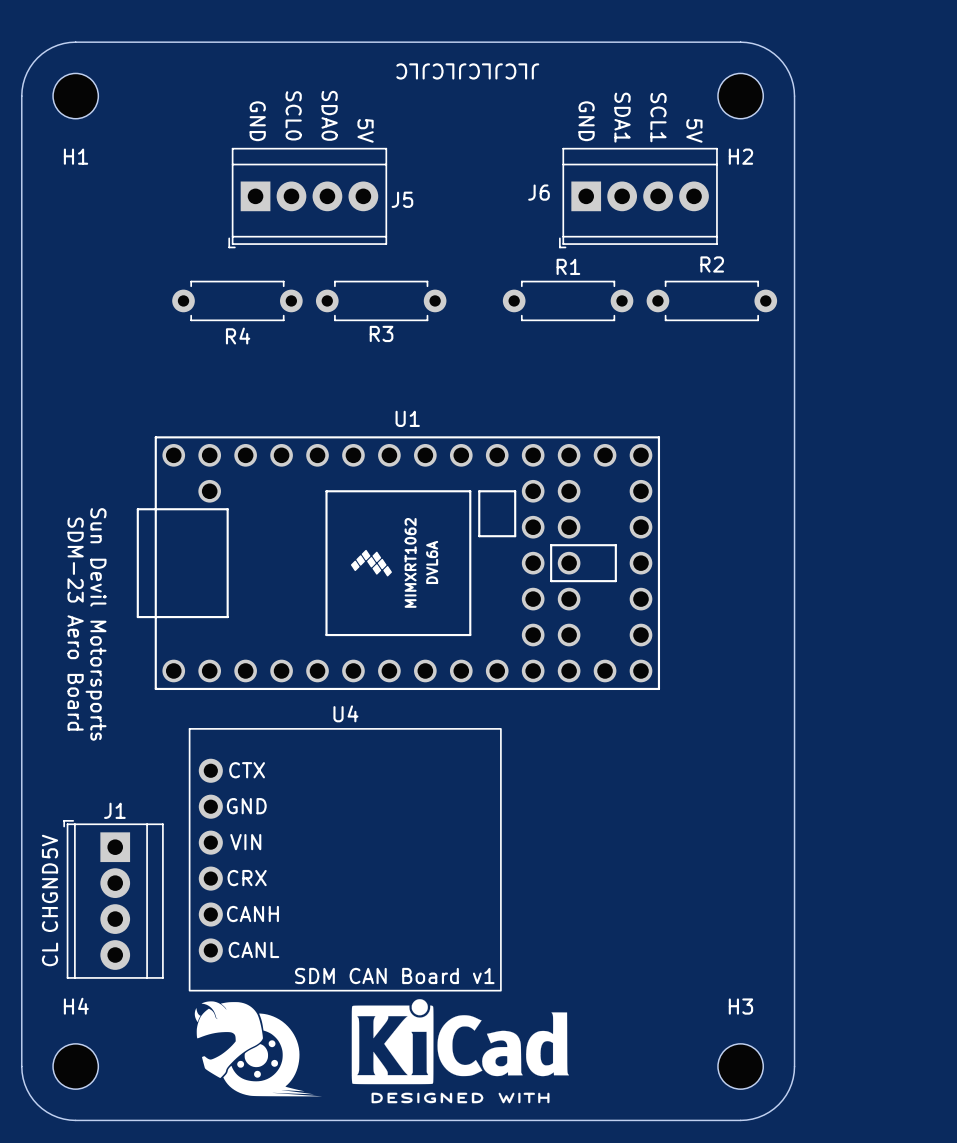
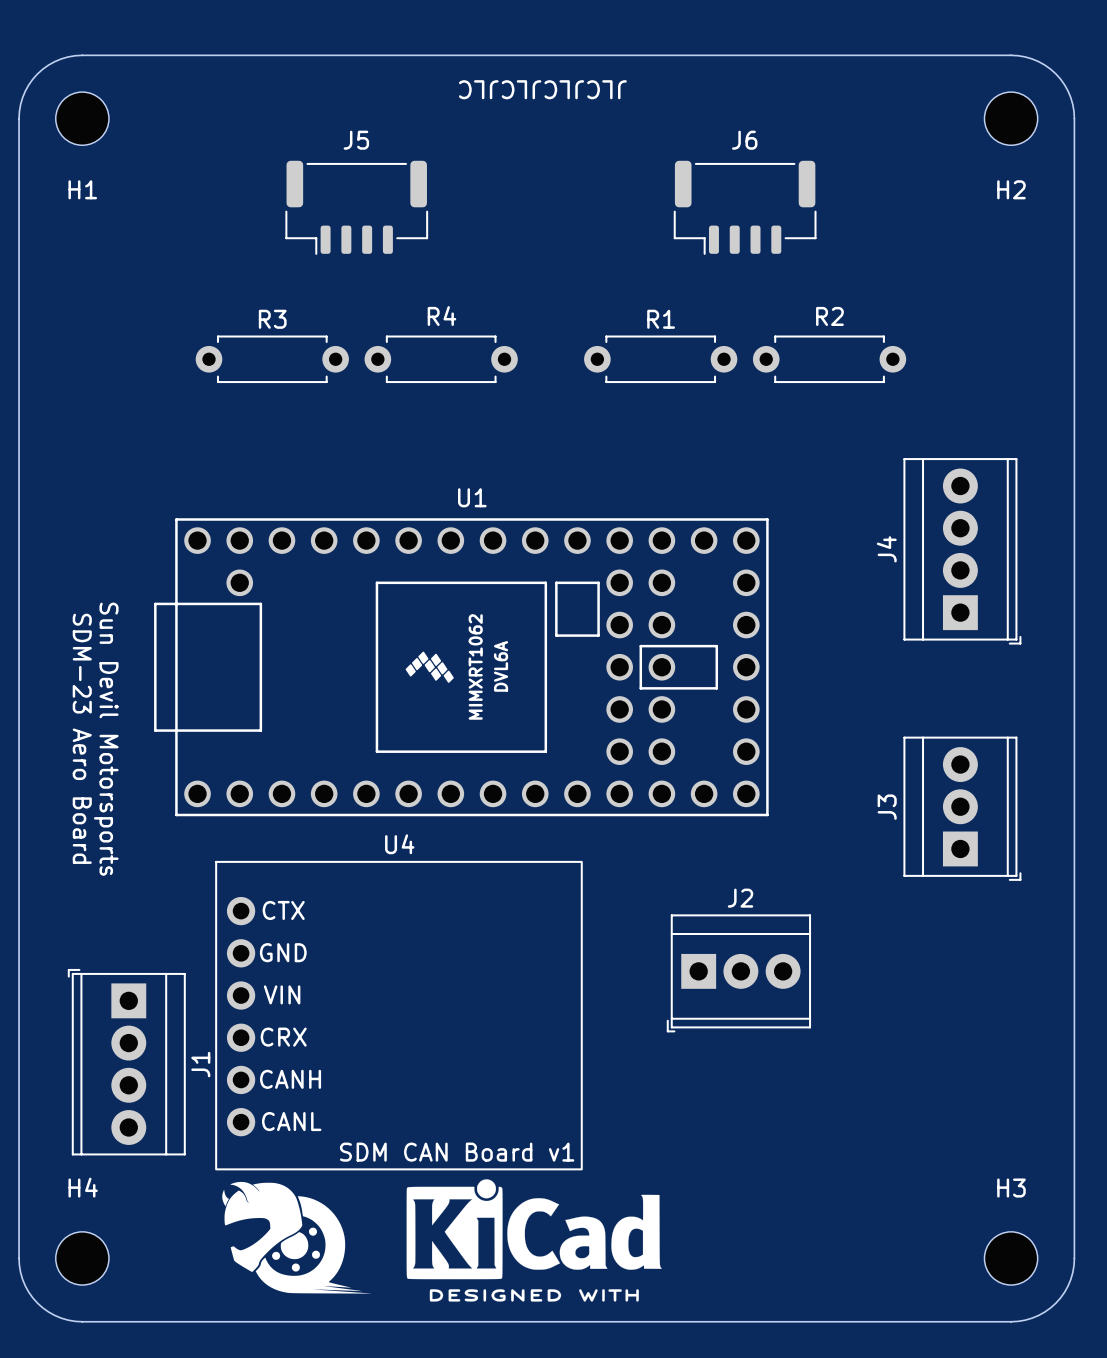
board edge: (740, 42) (758, 45) (778, 57) (791, 78) (794, 96) (794, 1066) (791, 1084) (778, 1104) (758, 1117) (740, 1120) -> (863, 55) (1011, 55) (1031, 58) (1050, 69) (1060, 79) (1070, 97) (1074, 118) (1074, 1258) (1072, 1272) (1064, 1292) (1055, 1303) (1044, 1312) (1025, 1320) (863, 1321)
H2 position: (740, 96) -> (1011, 118)
text: SCL0 (293, 115) -> none
text: SDA0 (329, 115) -> none
text: SDA1 (622, 117) -> none
text: SCL1 (658, 117) -> none
text: GND (257, 121) -> none
text: GND (586, 121) -> none
text: 5V (365, 130) -> none
text: 5V (694, 130) -> none
J5 footprint: [228, 147, 388, 249] -> [285, 160, 429, 255]
J6 footprint: [559, 147, 718, 249] -> [673, 160, 817, 255]
J6 name position: J6 (539, 192) -> J6 (744, 140)
J5 name position: J5 (402, 199) -> J5 (356, 140)
R3 name: R3 (381, 333) -> R4 (441, 316)
R4 name: R4 (238, 336) -> R3 (272, 319)
J4: none -> (962, 551)
J3: none -> (962, 808)
J1 name rotation: 0° (114, 810) -> 90° counterclockwise (200, 1064)
J1 name position: J1 (114, 810) -> J1 (200, 1064)
J2: none -> (738, 973)
text: 5V (50, 846) -> none
text: GND (50, 883) -> none
text: CH (50, 919) -> none
text: CL (50, 954) -> none
H3 position: (740, 1066) -> (1011, 1258)

